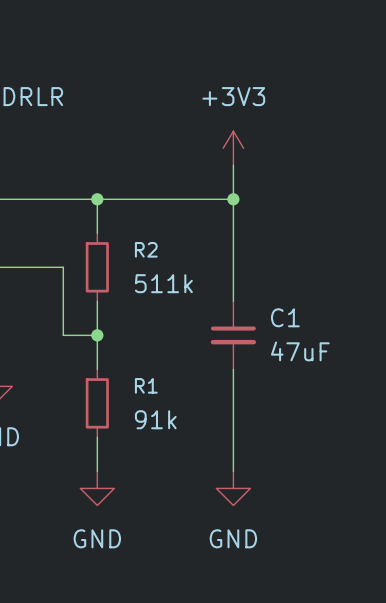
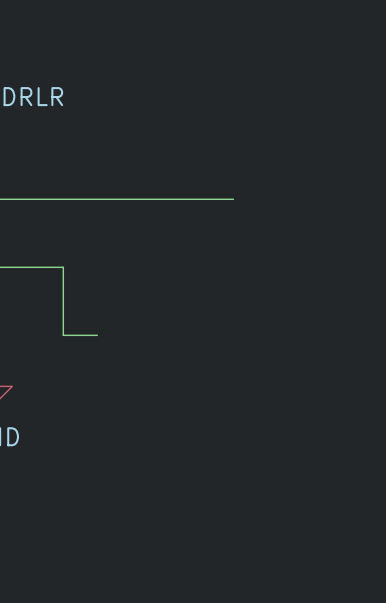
power symbol: +3V3 (233, 148) -> none
wire: (233, 165) (233, 301) -> none
wire: (97, 199) (97, 233) -> none
junction: (97, 199) -> none
junction: (233, 199) -> none
R2: 511k (97, 267) -> none
wire: (97, 301) (97, 369) -> none
junction: (97, 335) -> none
C1: 47uF (233, 335) -> none
wire: (233, 369) (233, 471) -> none
R1: 91k (97, 403) -> none
wire: (97, 437) (97, 471) -> none
power symbol: GND (97, 488) -> none
power symbol: GND (233, 488) -> none

